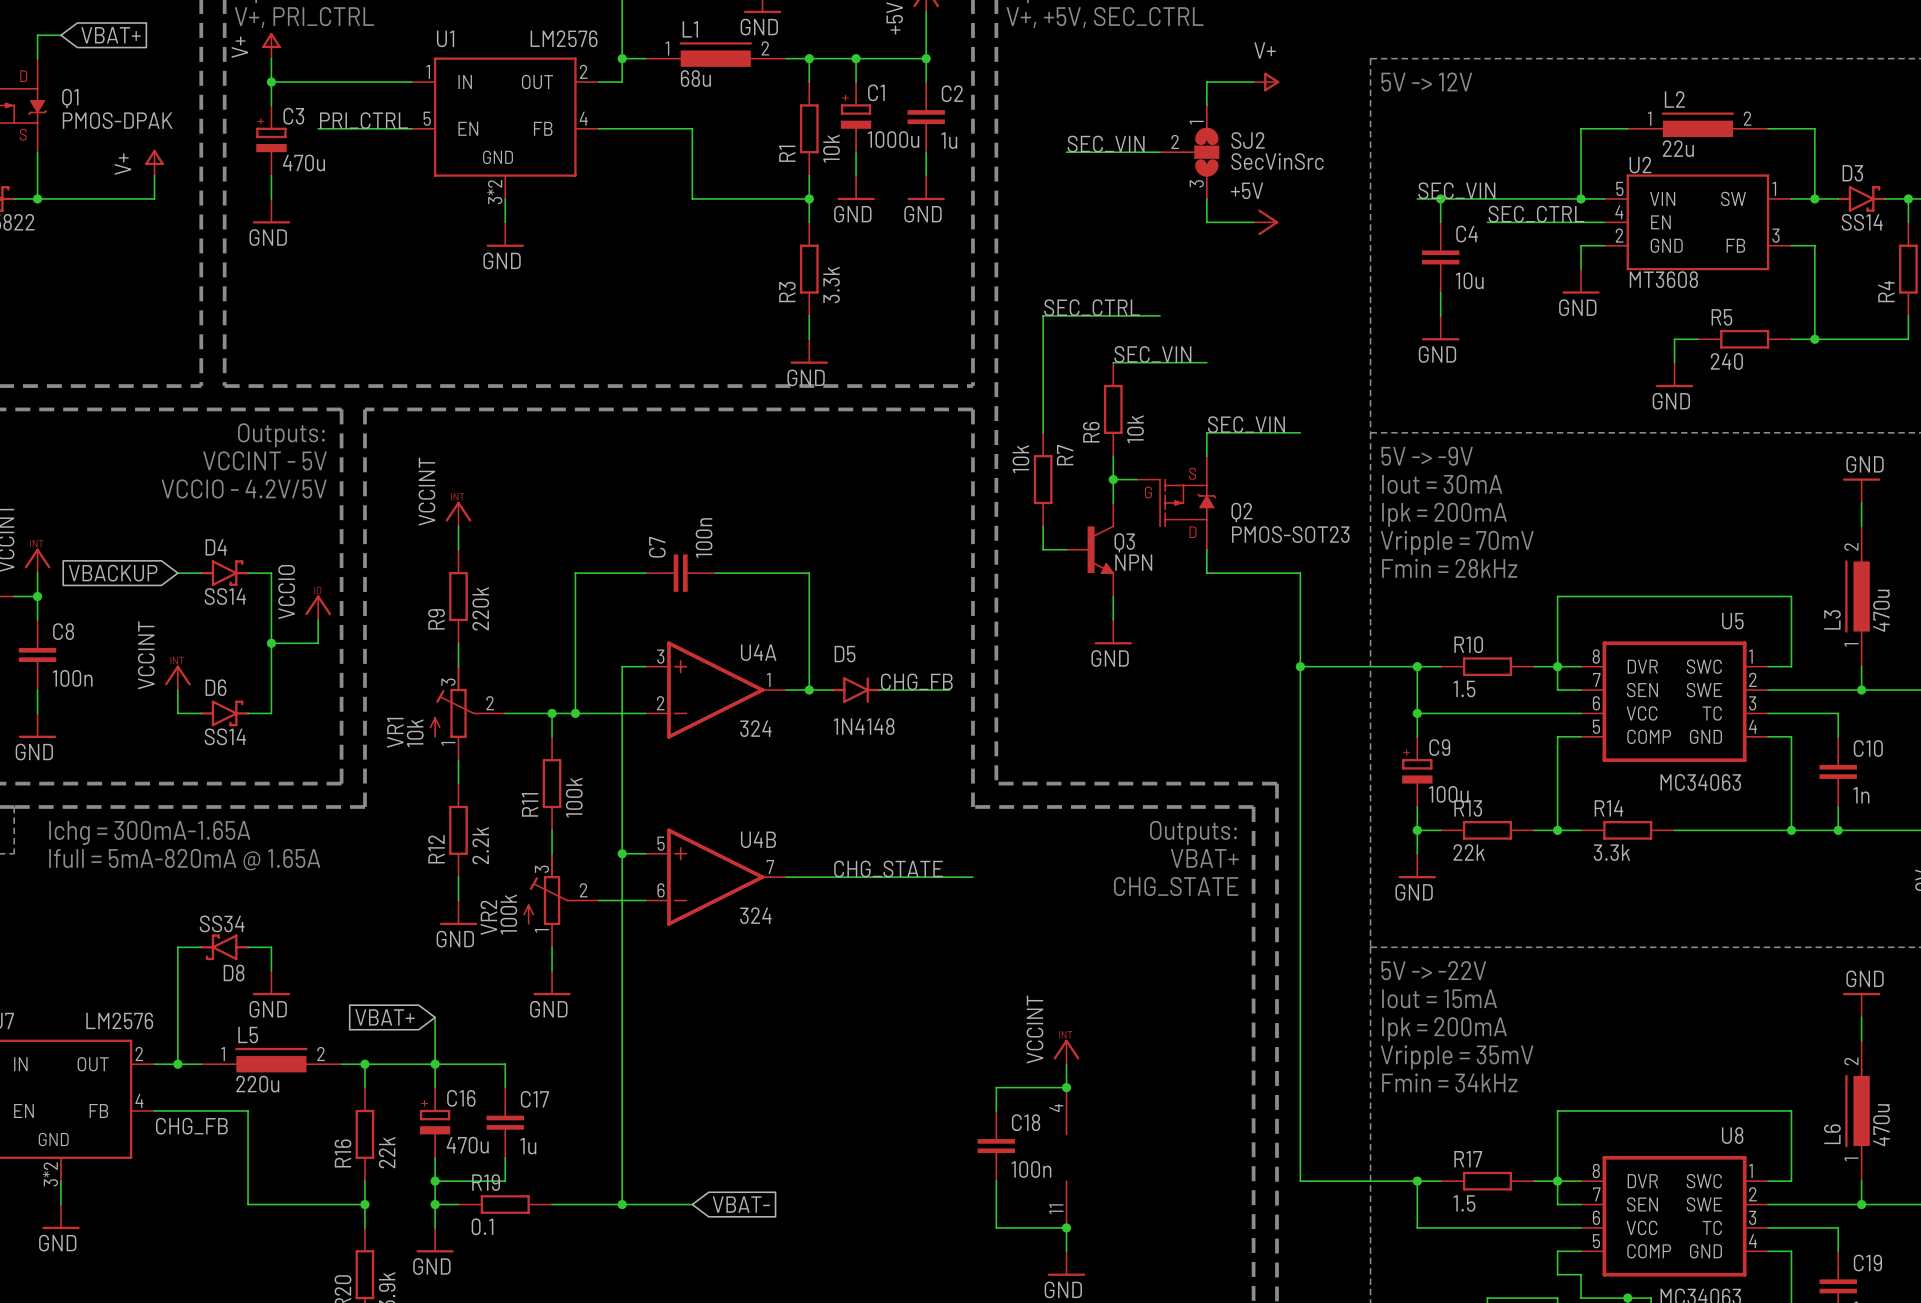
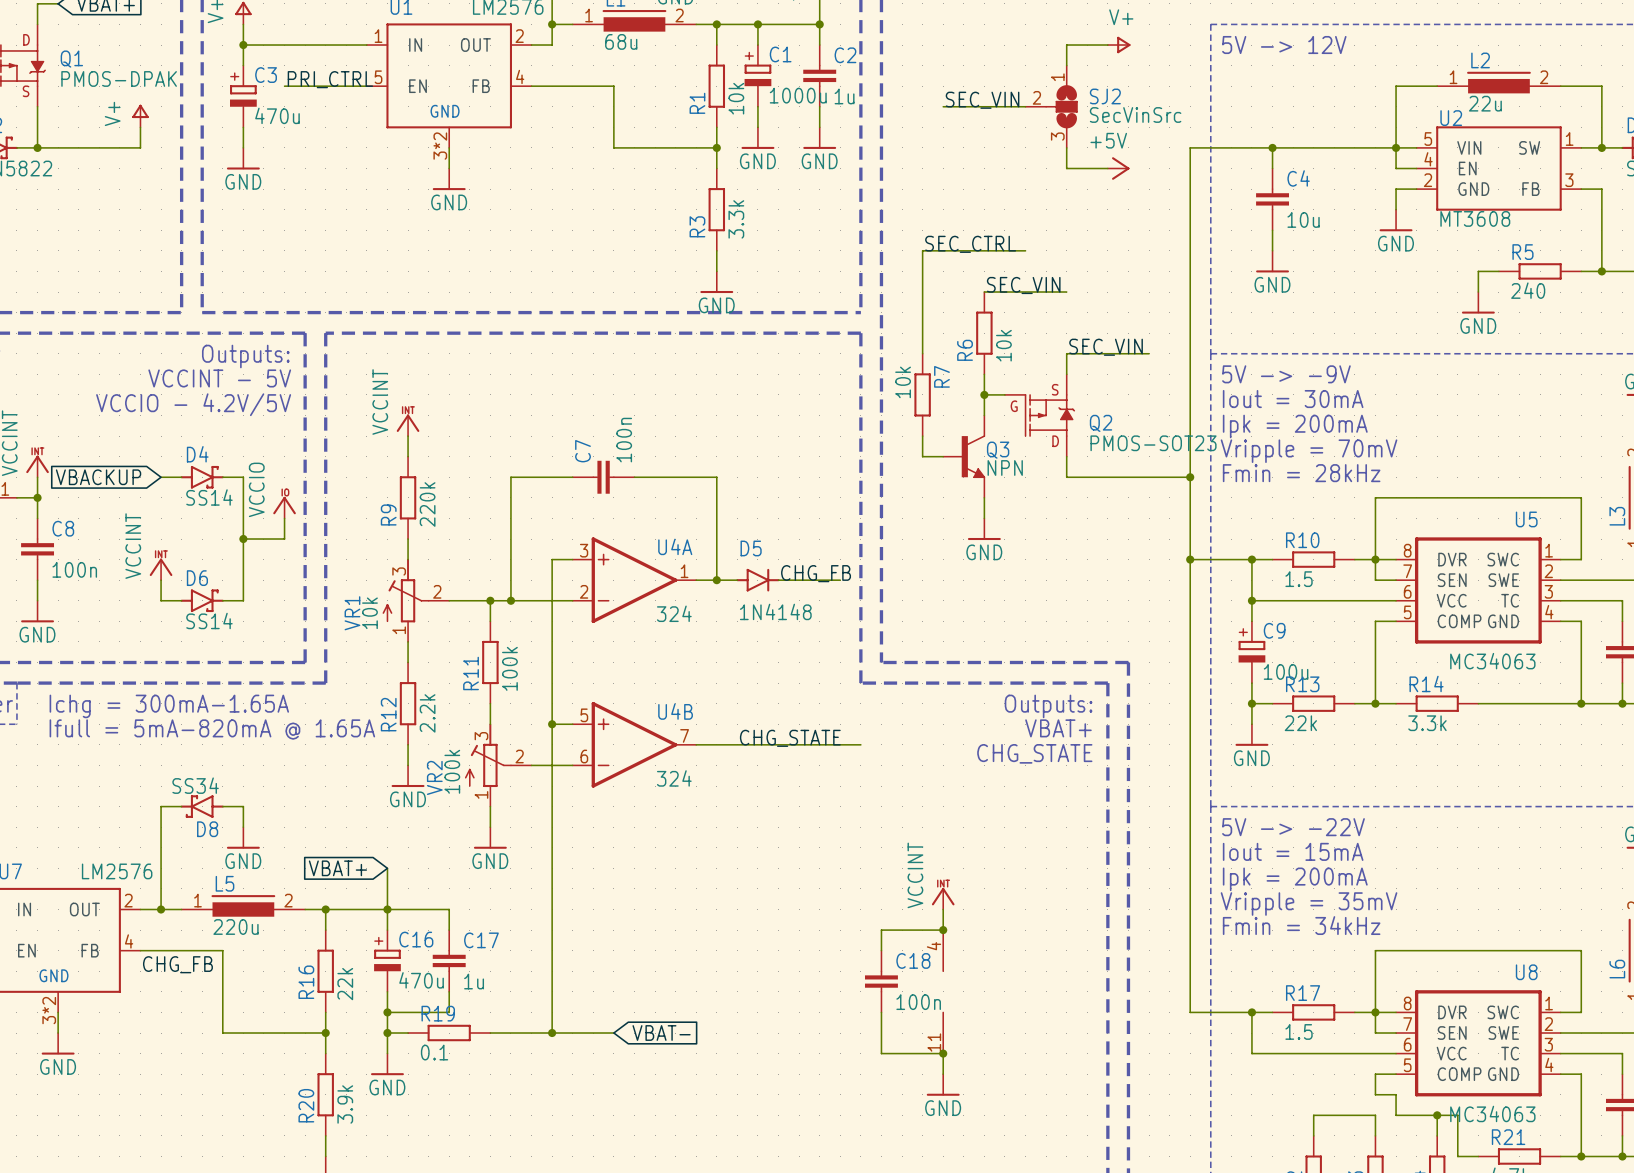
label: SEC_VIN (1456, 190) -> none
label: SEC_CTRL (1536, 214) -> none
wire: (1487, 222) (1581, 222) -> (1396, 147) (1396, 168)
wire: (1300, 573) (1300, 1181) (1347, 1181) -> (1251, 147) (1190, 147) (1190, 1012)
junction: none -> (1190, 477)
wire: (1300, 666) (1347, 666) -> (1149, 477) (1190, 477)
junction position: (1300, 666) -> (1190, 559)

